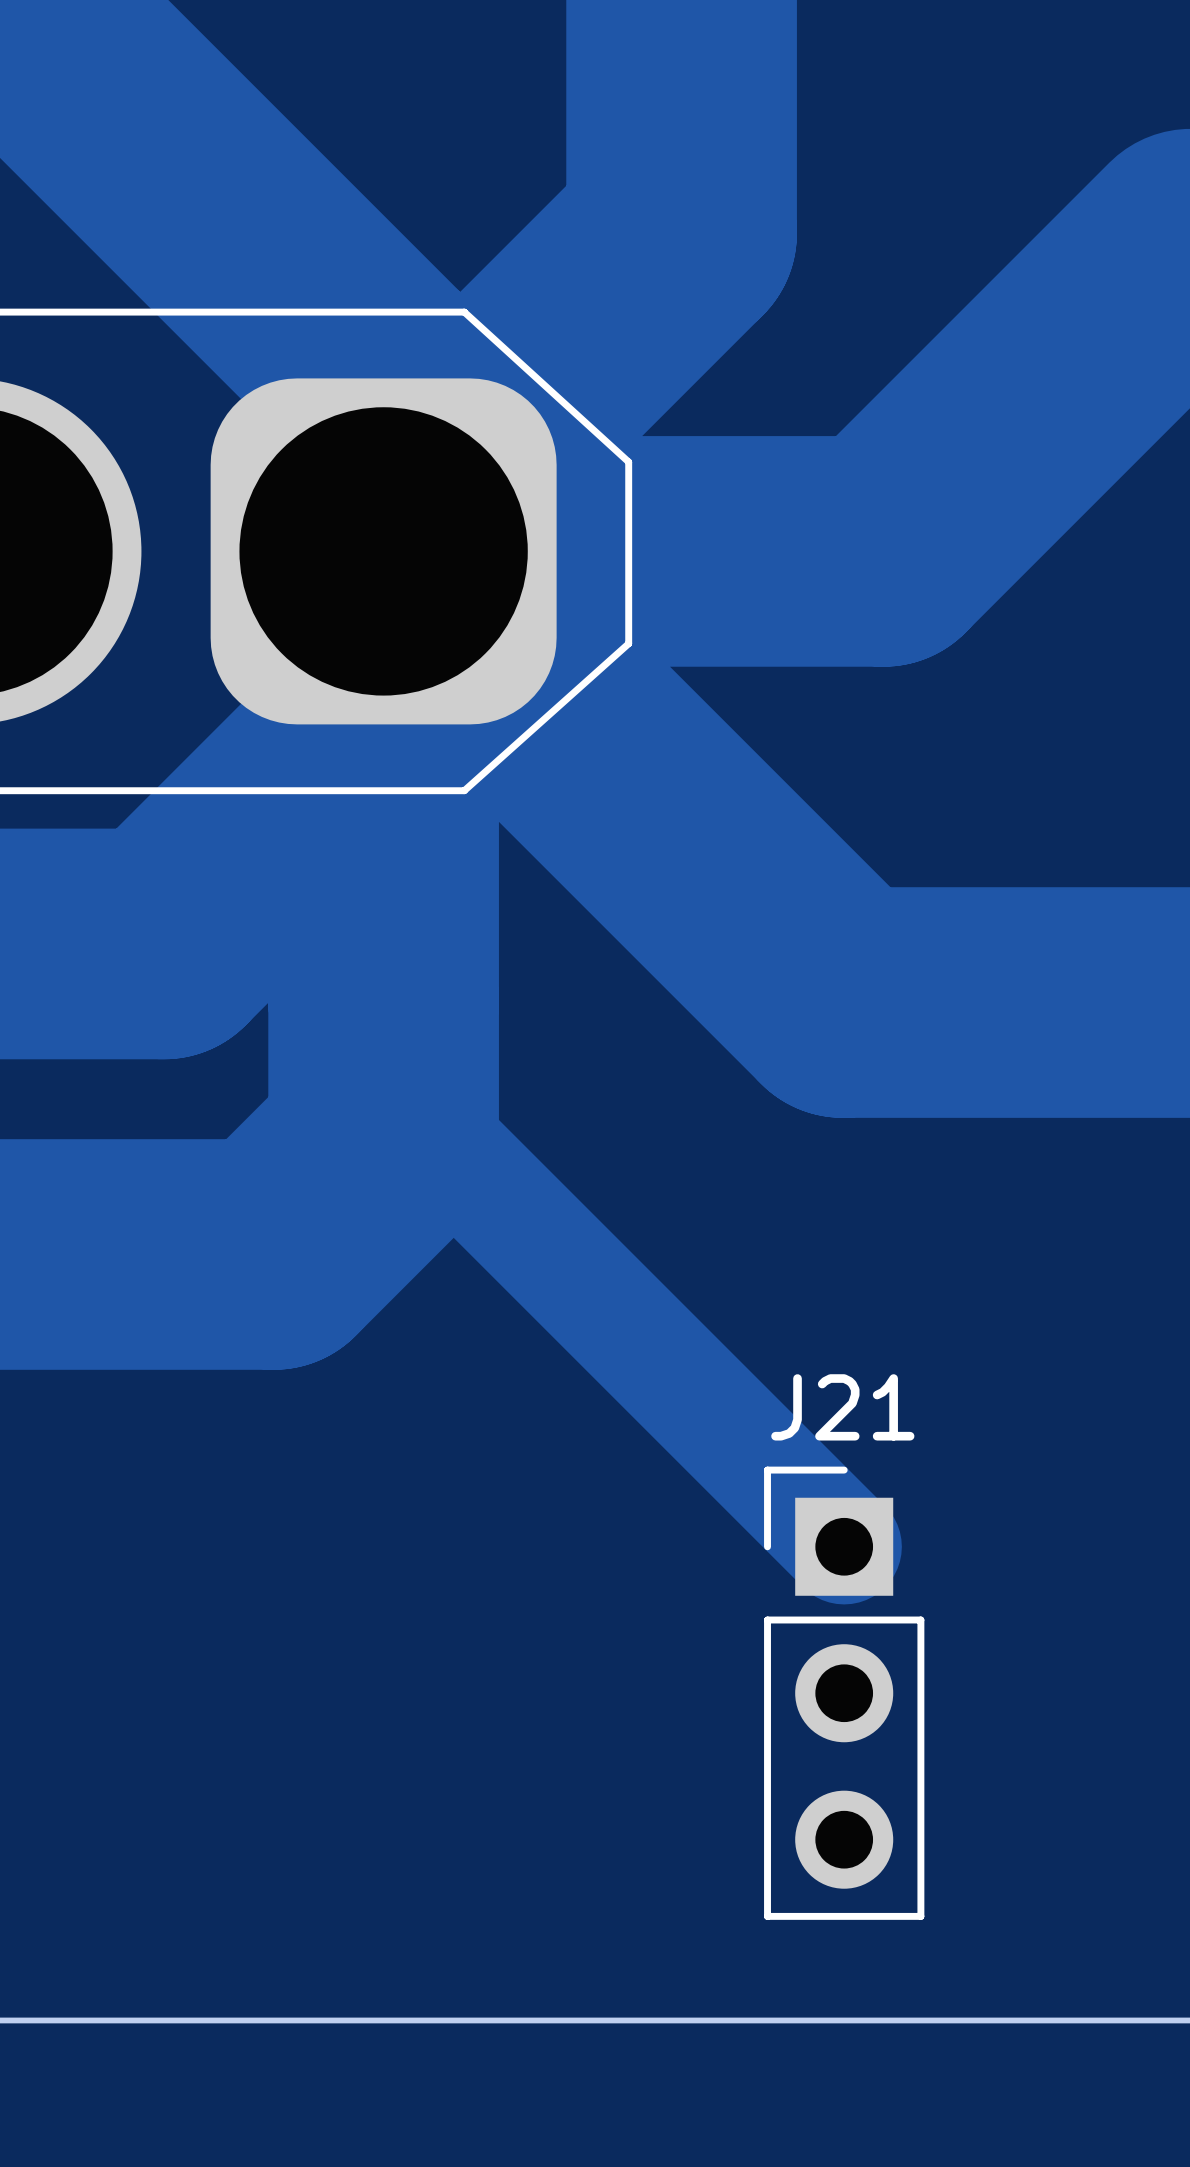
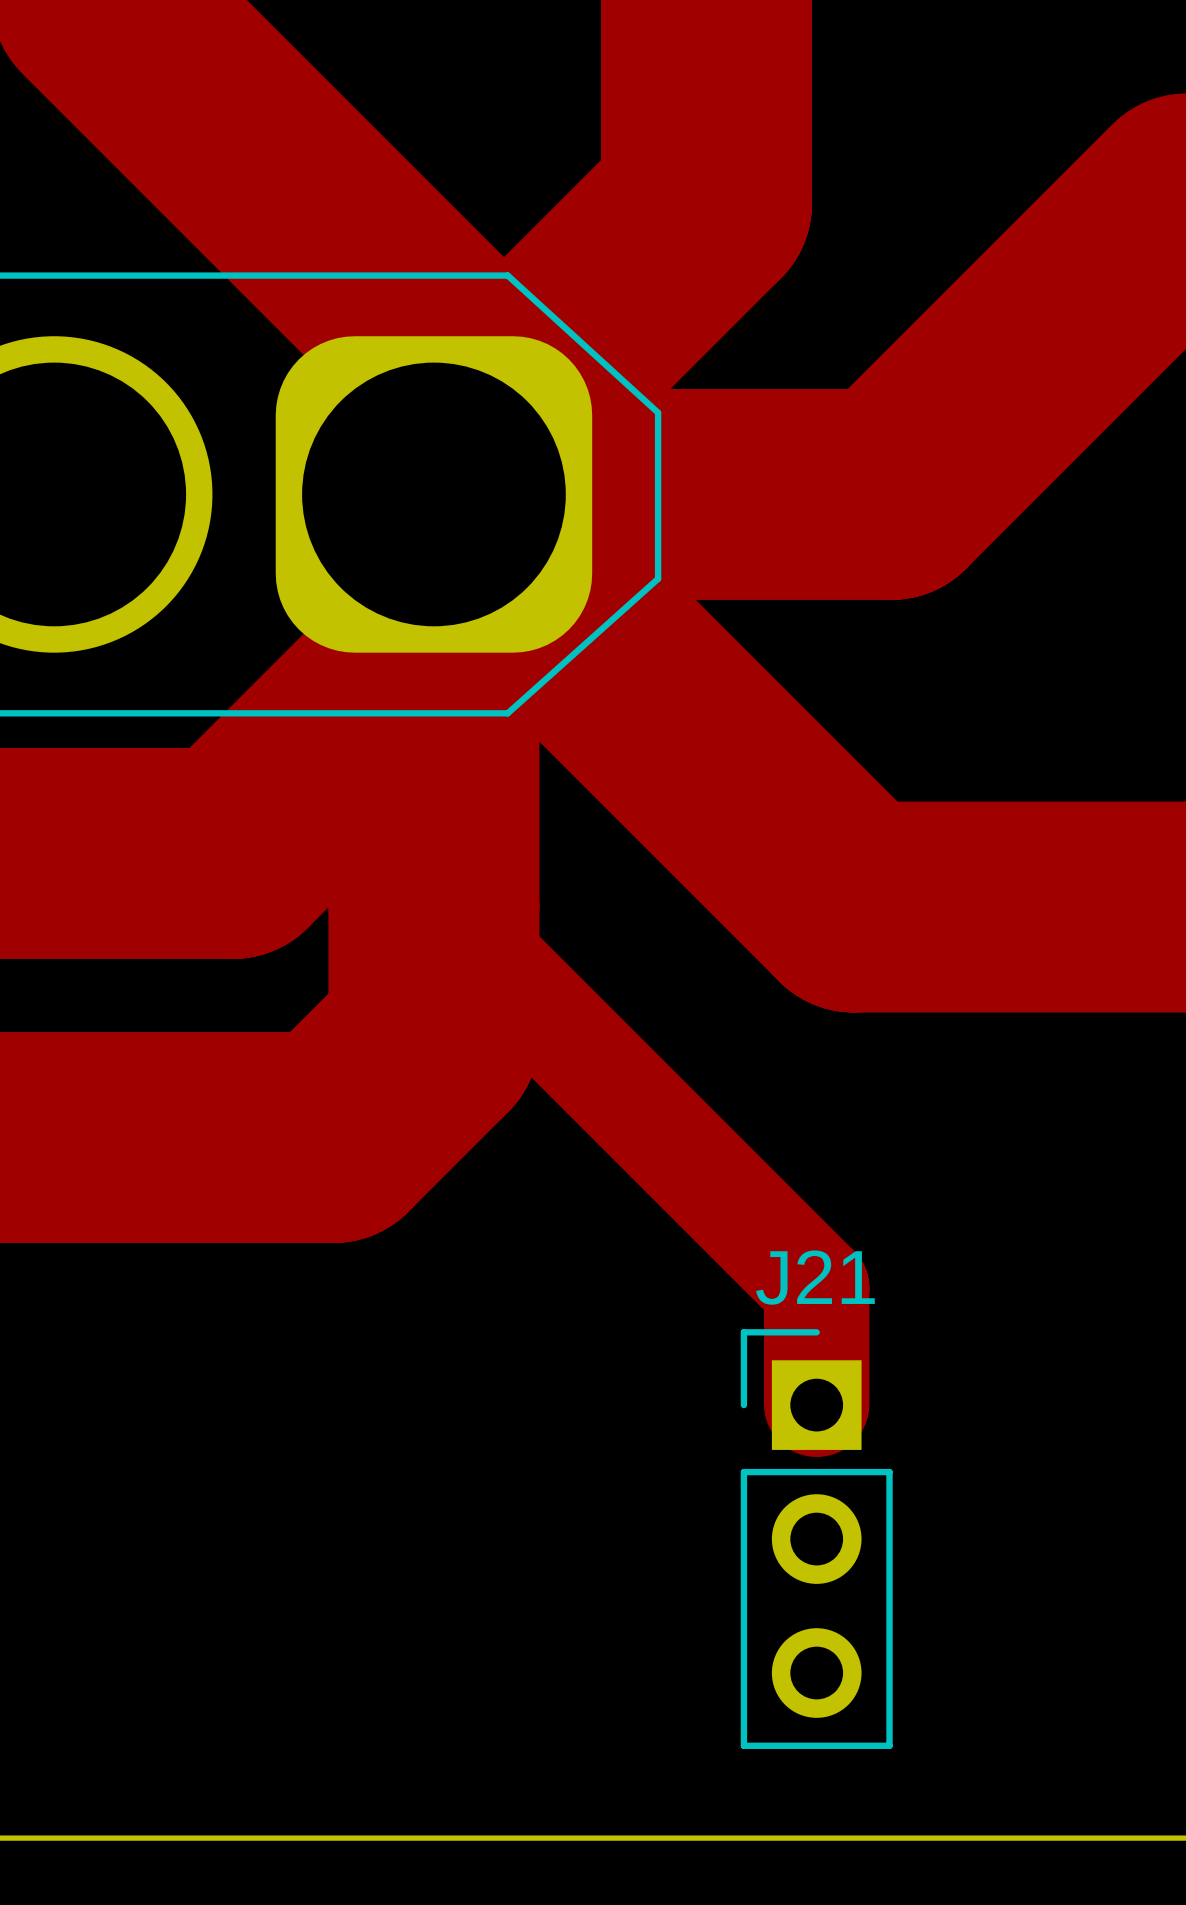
track: (383, 1000) (383, 1086) (844, 1546) -> (433, 905) (816, 1288) (816, 1404)
J21 name position: J21 (842, 1407) -> J21 (815, 1277)
J21 footprint: [764, 1466, 925, 1920] -> [740, 1329, 893, 1749]

